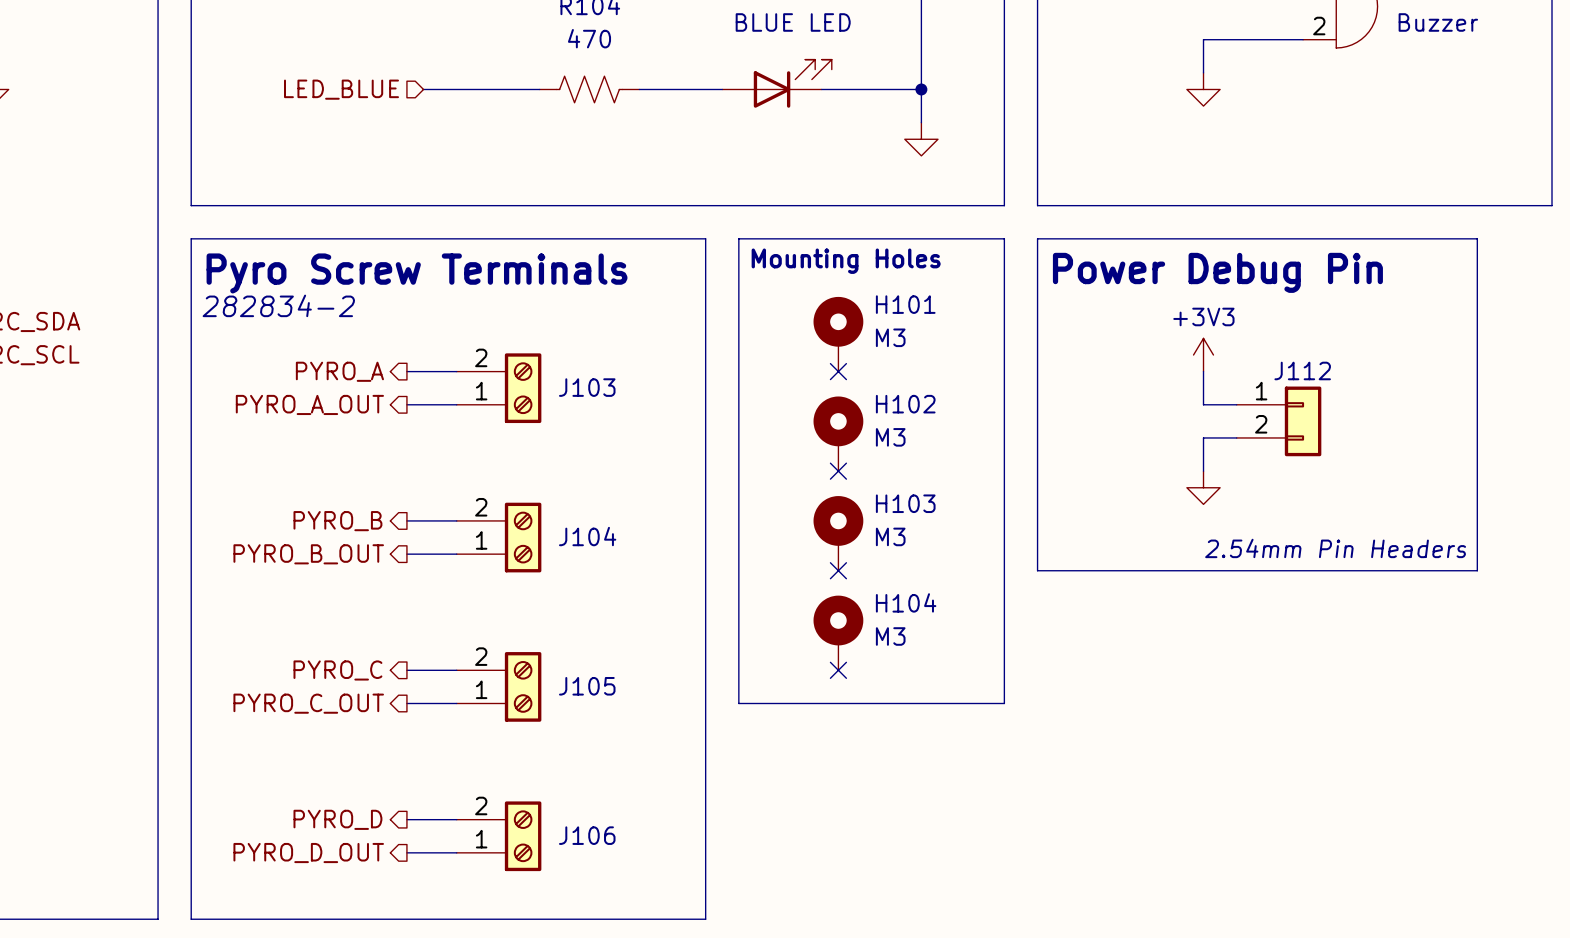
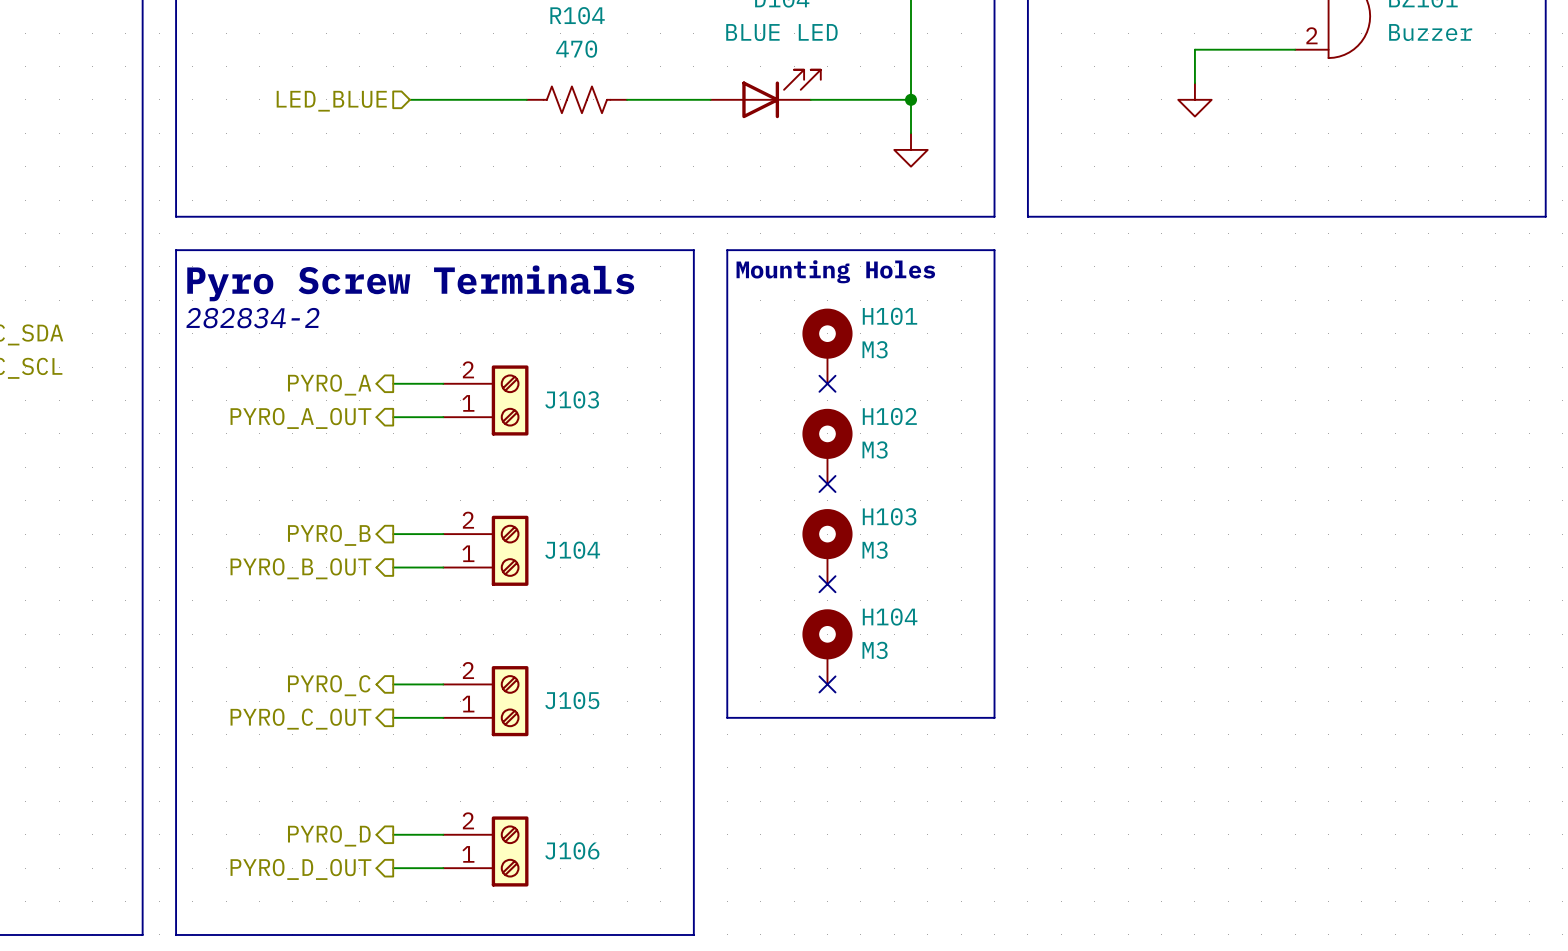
line: (1037, 238) (1477, 238) (1477, 570) (1037, 570) (1037, 238) -> none
text: Power Debug Pin (1217, 272) -> none
power symbol: +3V3 (1203, 355) -> none
wire: (1203, 371) (1203, 404) (1236, 404) -> none
J112: (1279, 421) -> none
wire: (1236, 437) (1203, 437) (1203, 471) -> none
power symbol: (1203, 487) -> none
text: 2.54mm Pin Headers (1335, 548) -> none

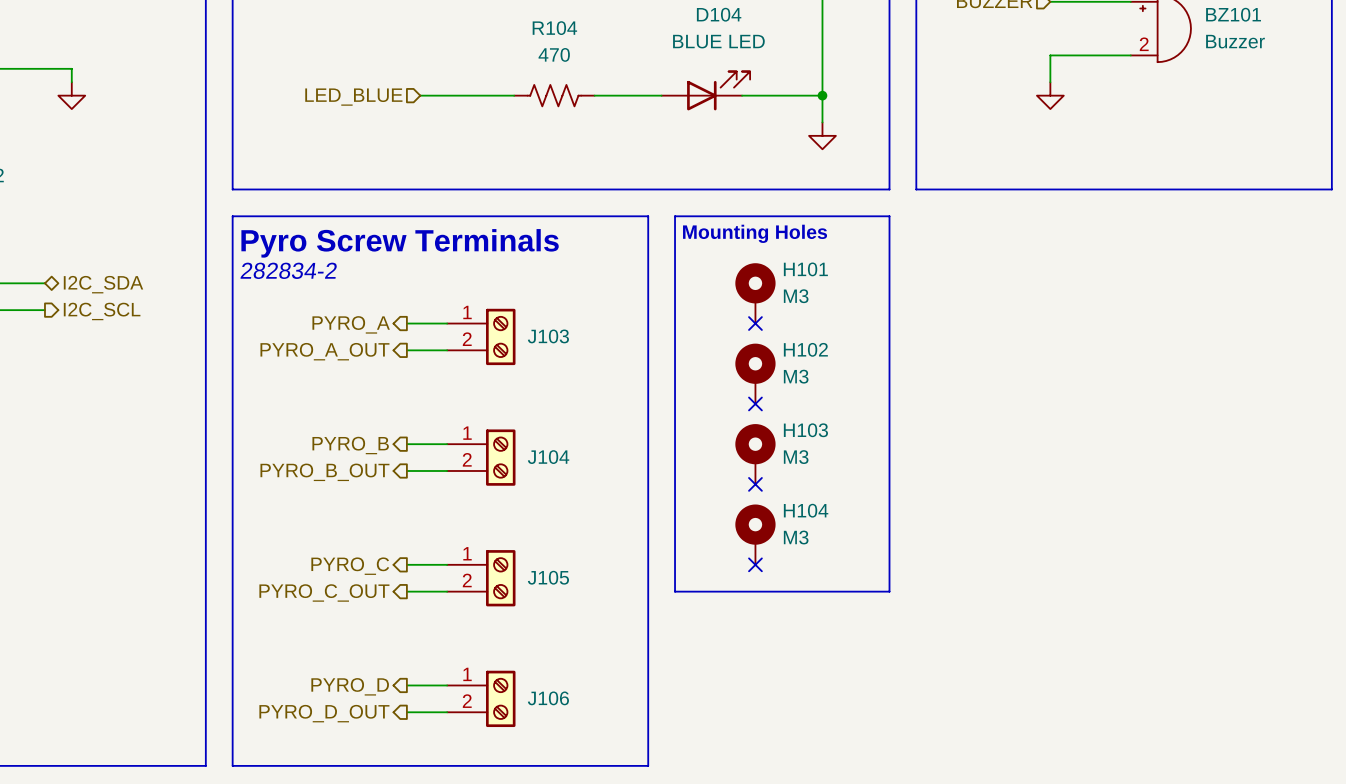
J103 flip: as is (510, 400) -> up-down (500, 336)
J104 flip: as is (510, 550) -> up-down (500, 457)
J105 flip: as is (510, 701) -> up-down (500, 578)
J106 flip: as is (510, 851) -> up-down (500, 698)

